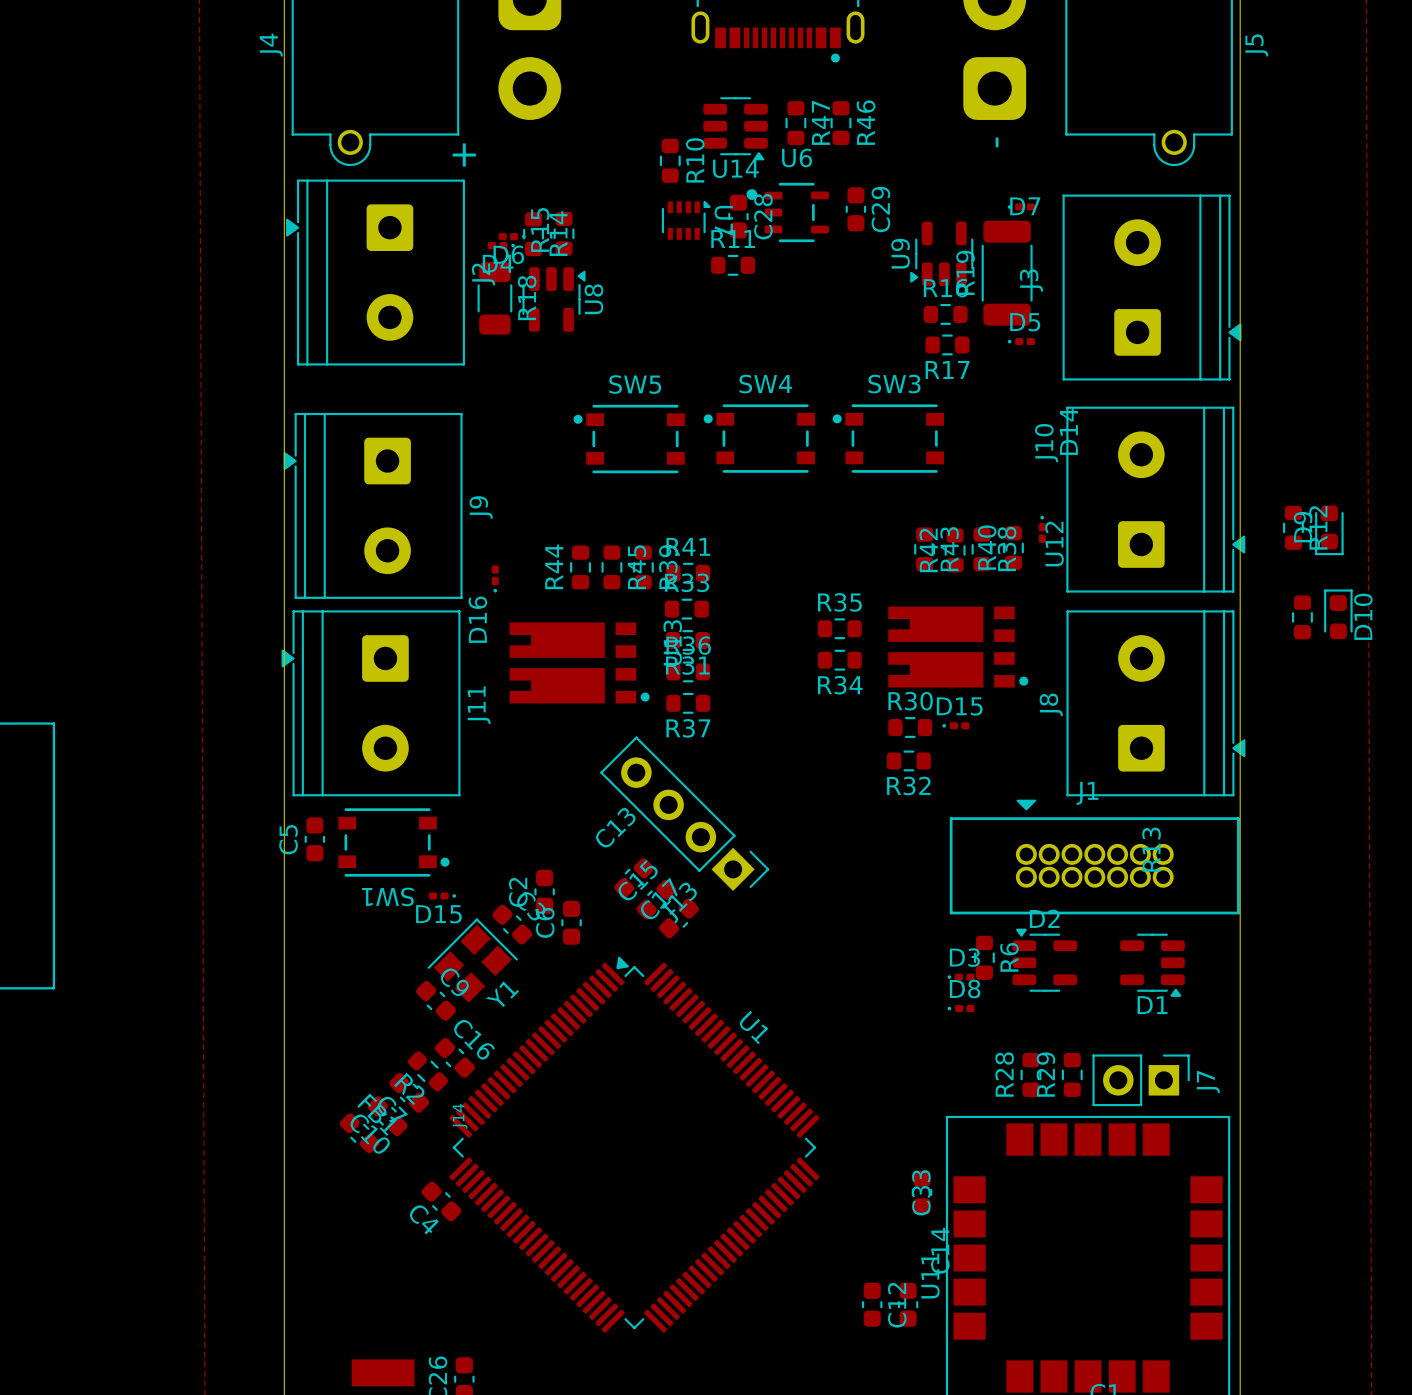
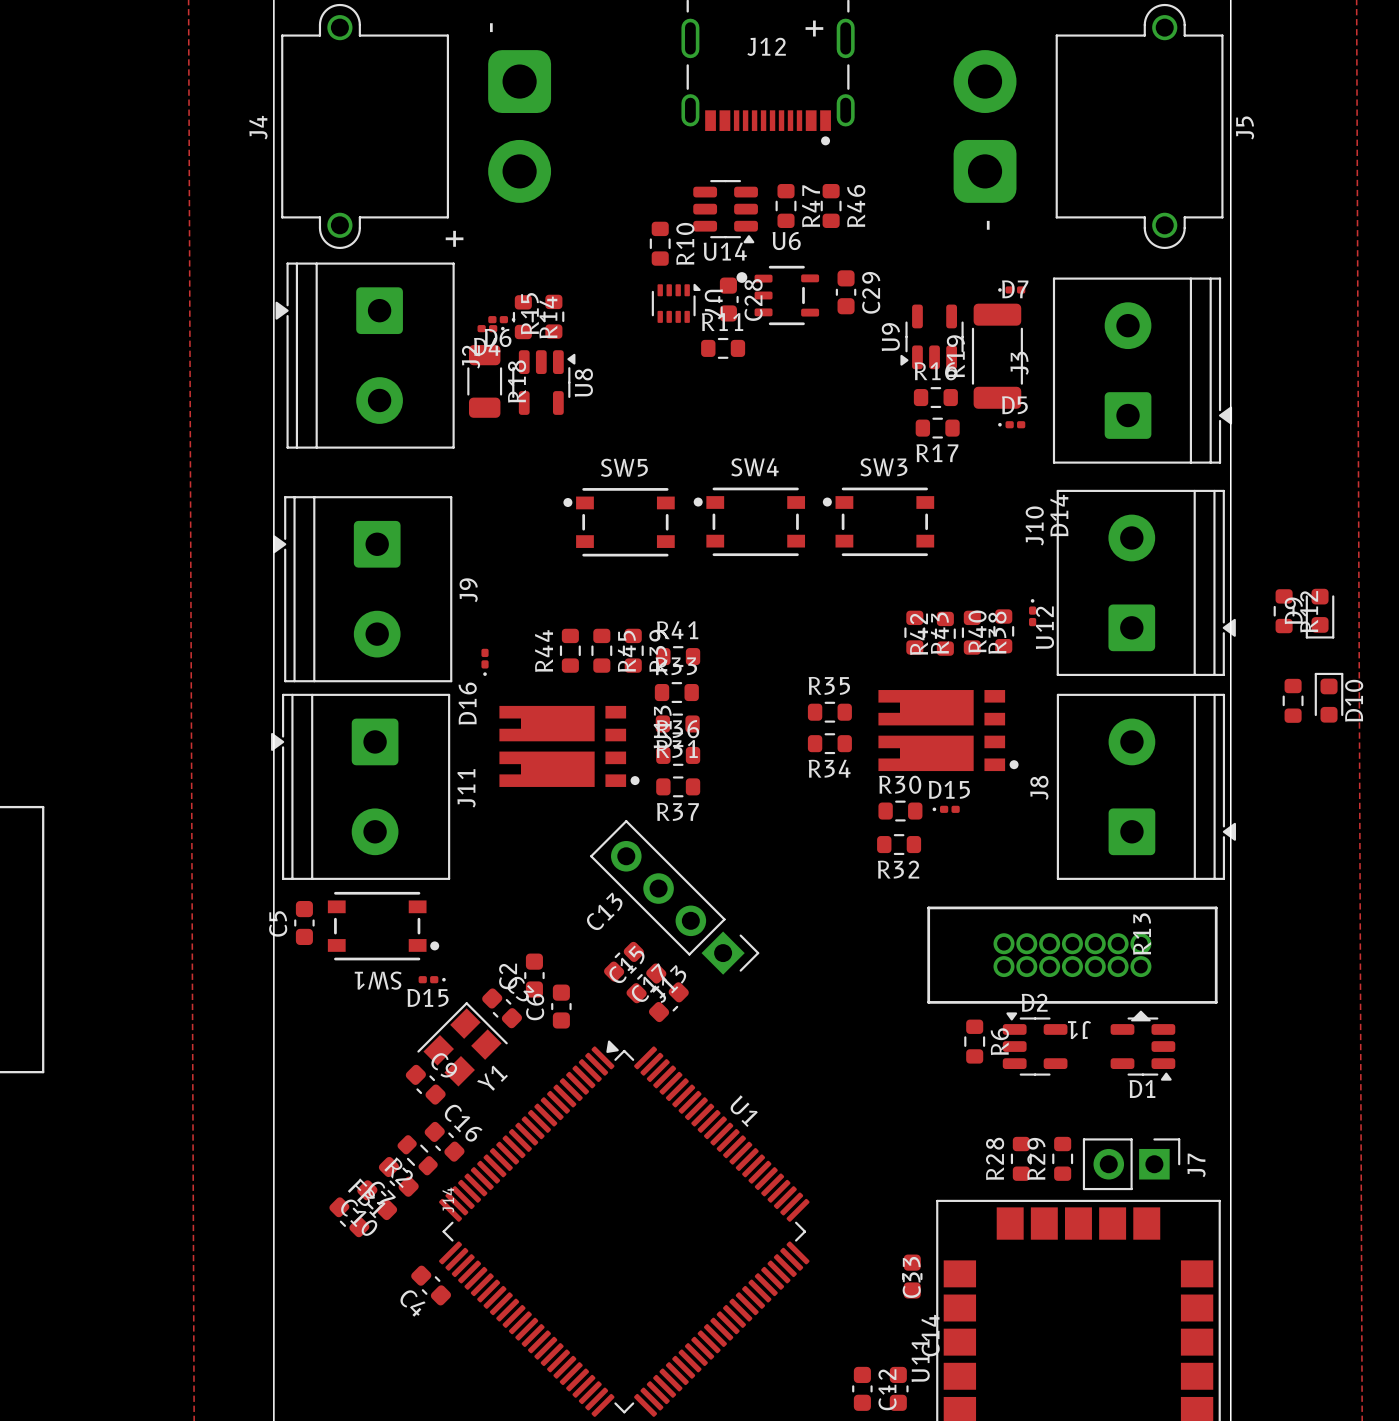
J1 rotation: 0° (1094, 857) -> 180° (1072, 963)
D3: (961, 977) -> none
D8: (961, 1008) -> none

